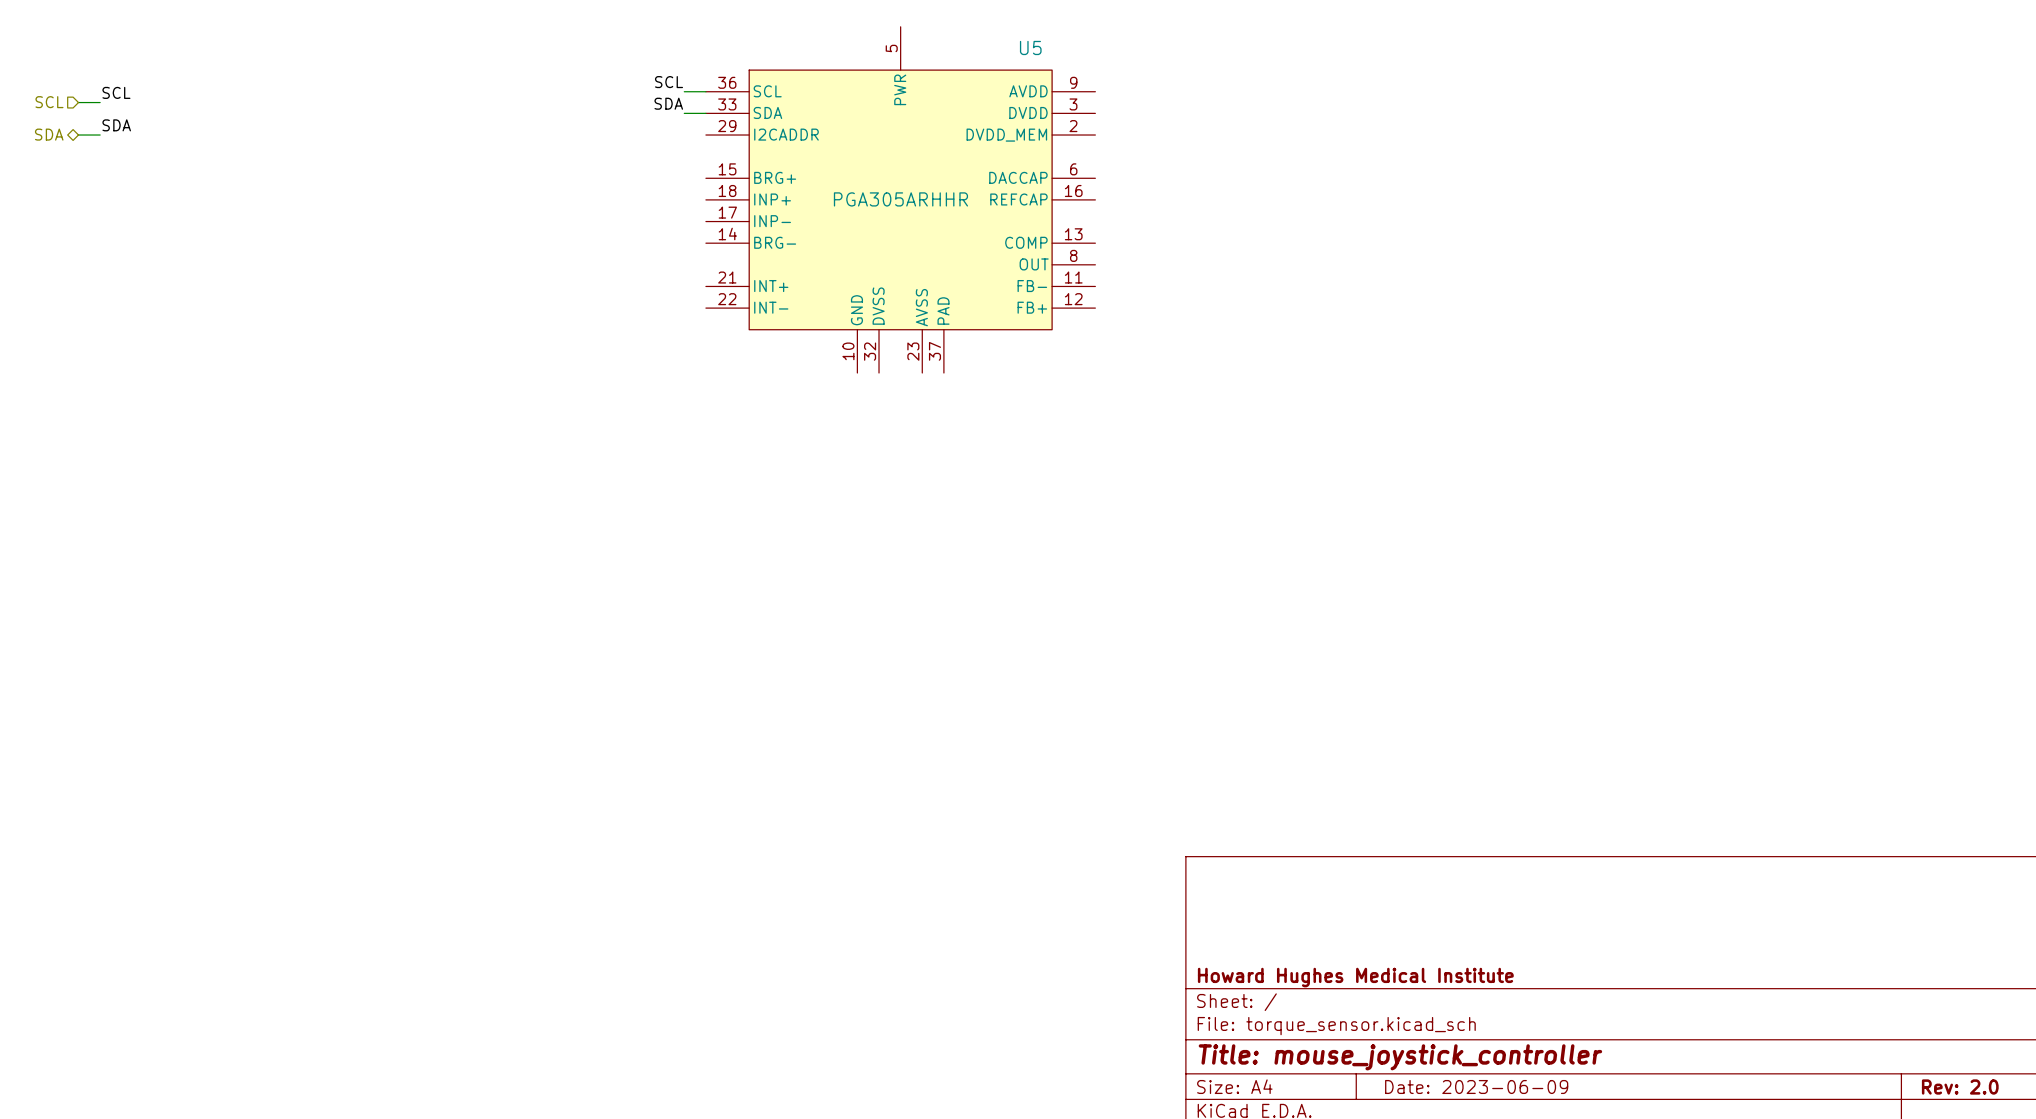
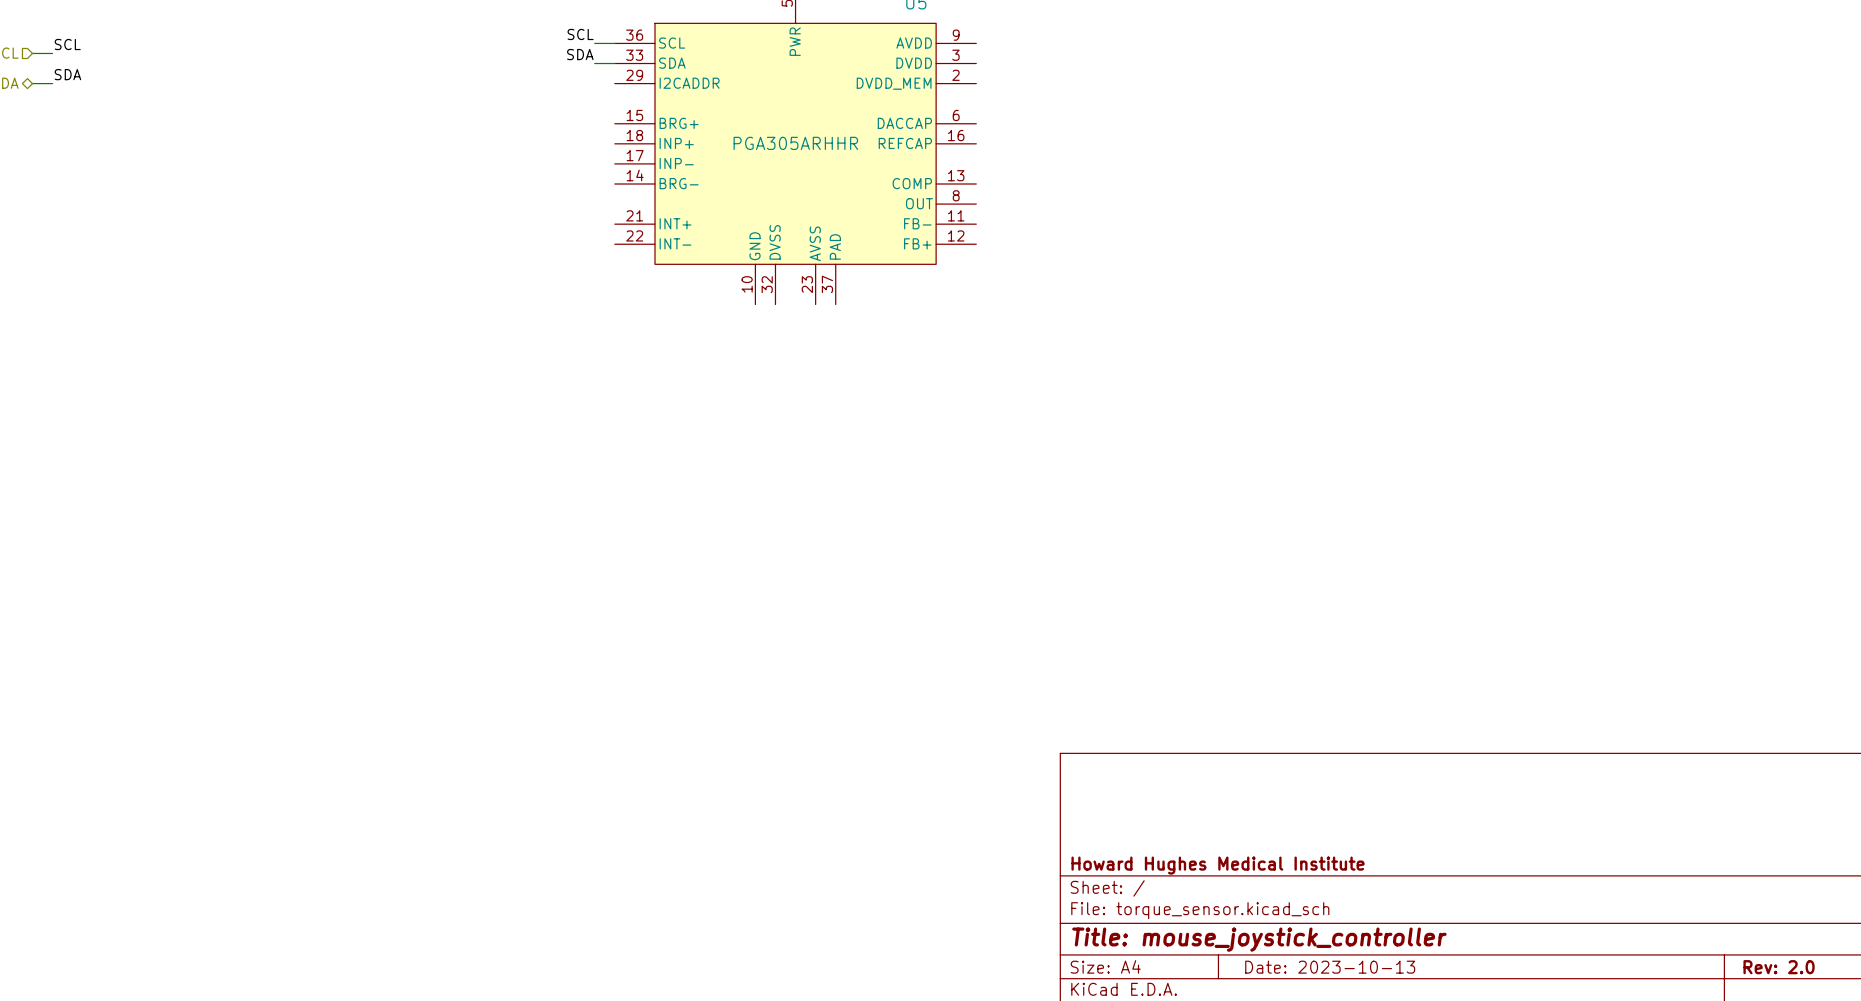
title block: Date: 2023-06-09 (1476, 1086) -> Date: 2023-10-13 (1330, 967)

